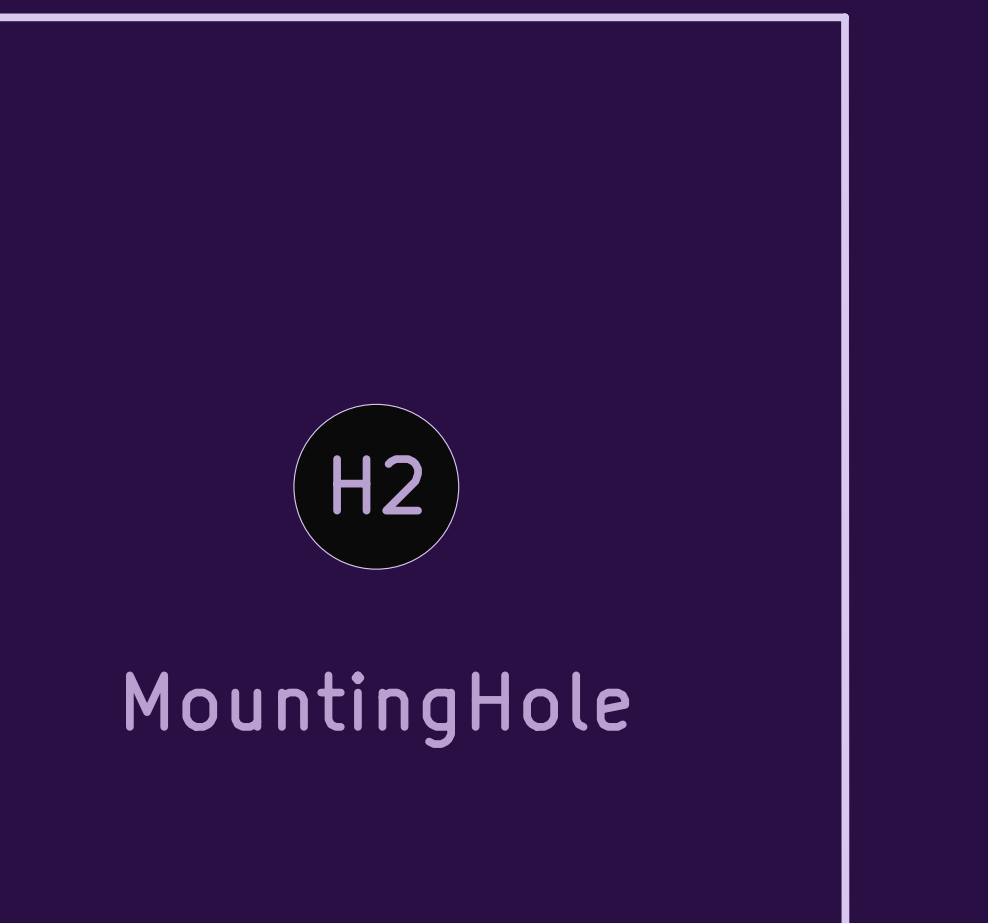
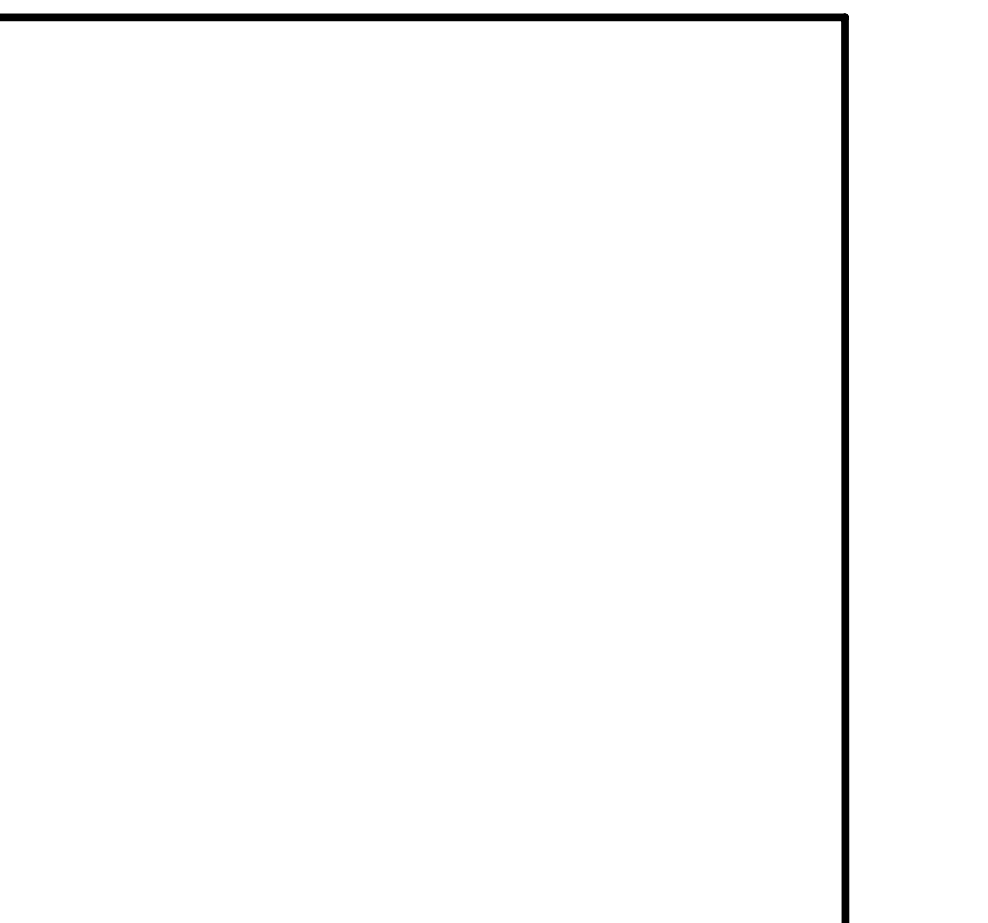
H2: MountingHole (376, 486) -> none

